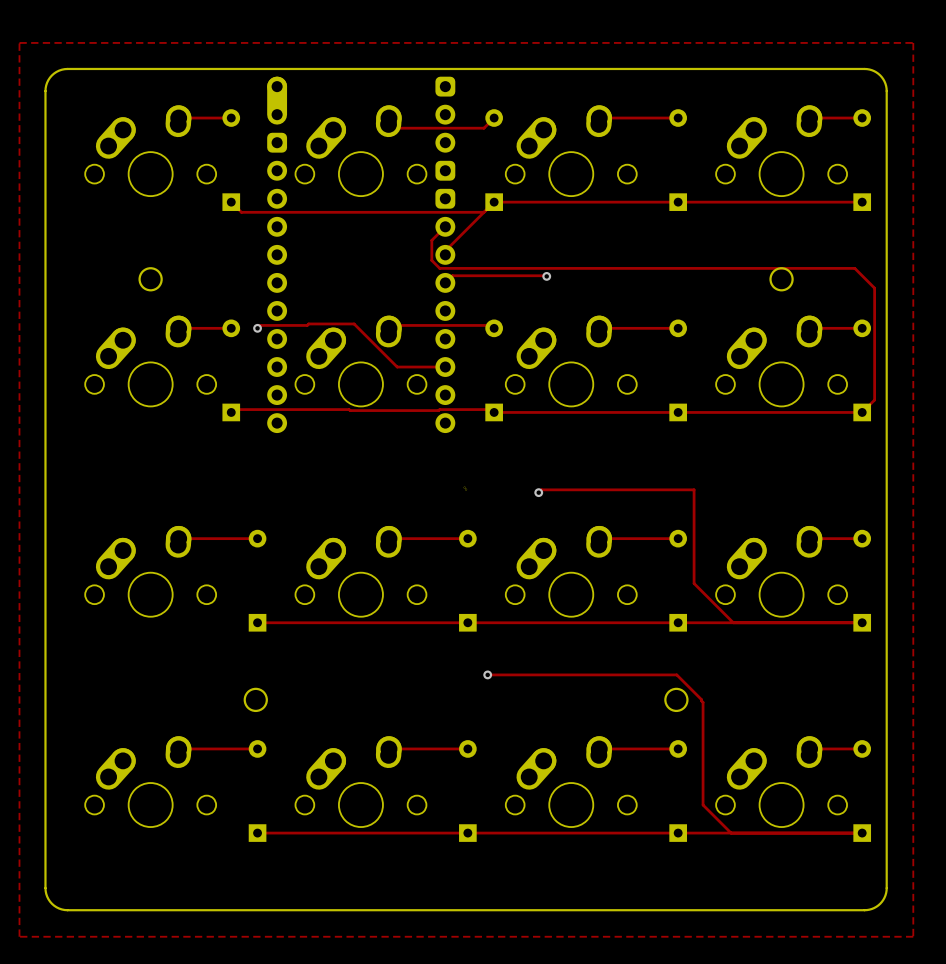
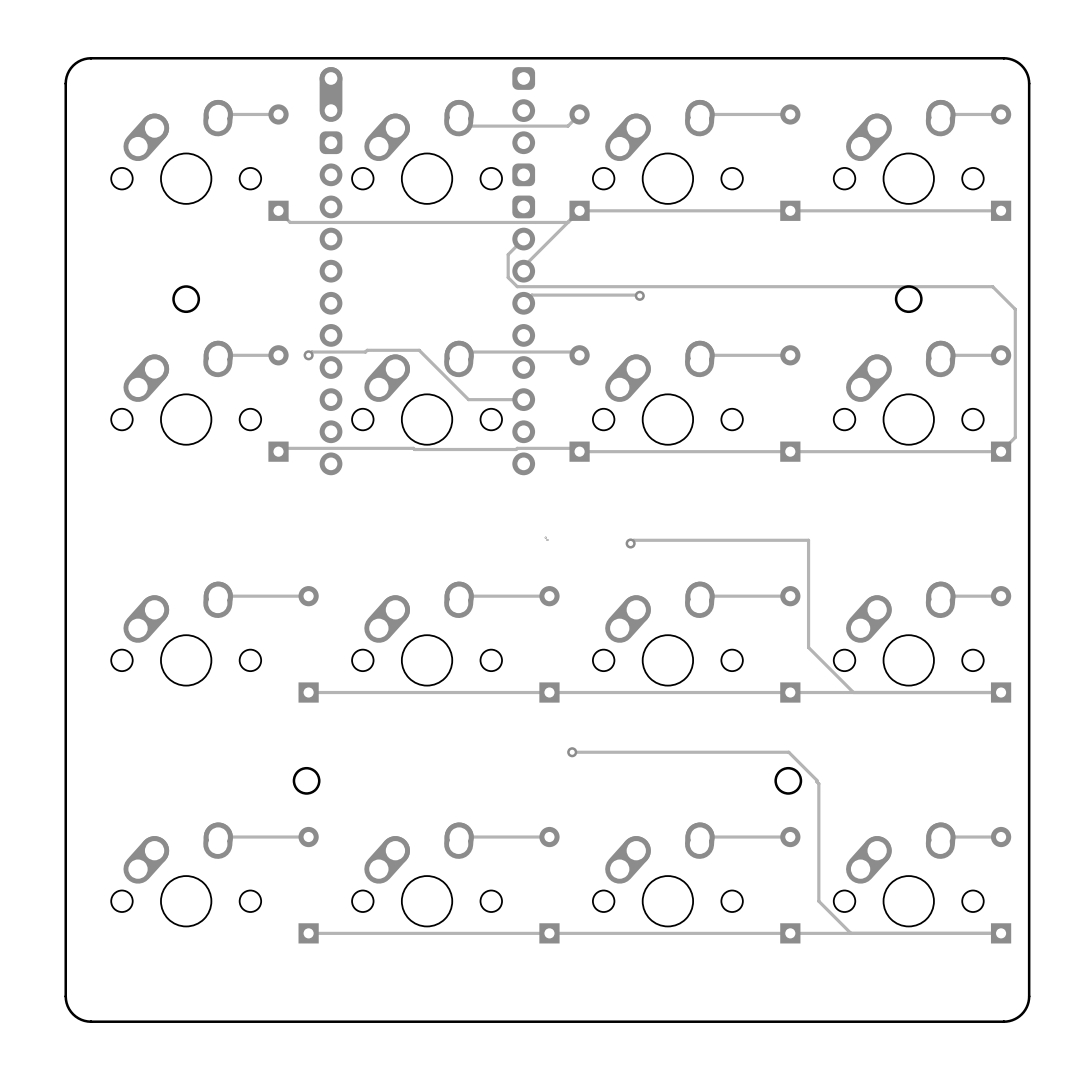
zone outline: (19, 42) (913, 42) (913, 936) (19, 936) (19, 42) -> none

